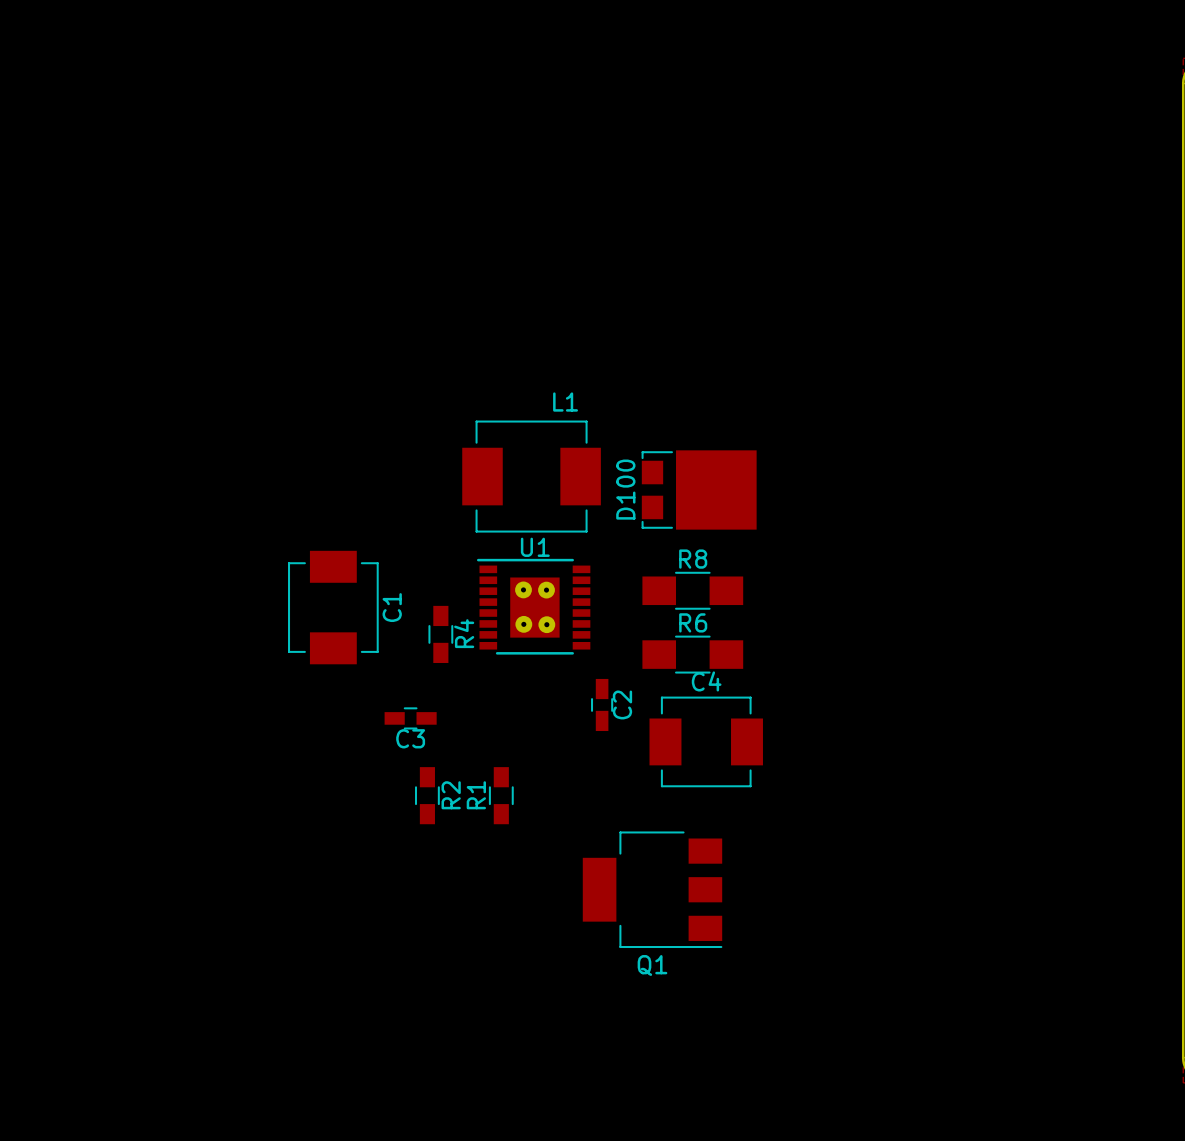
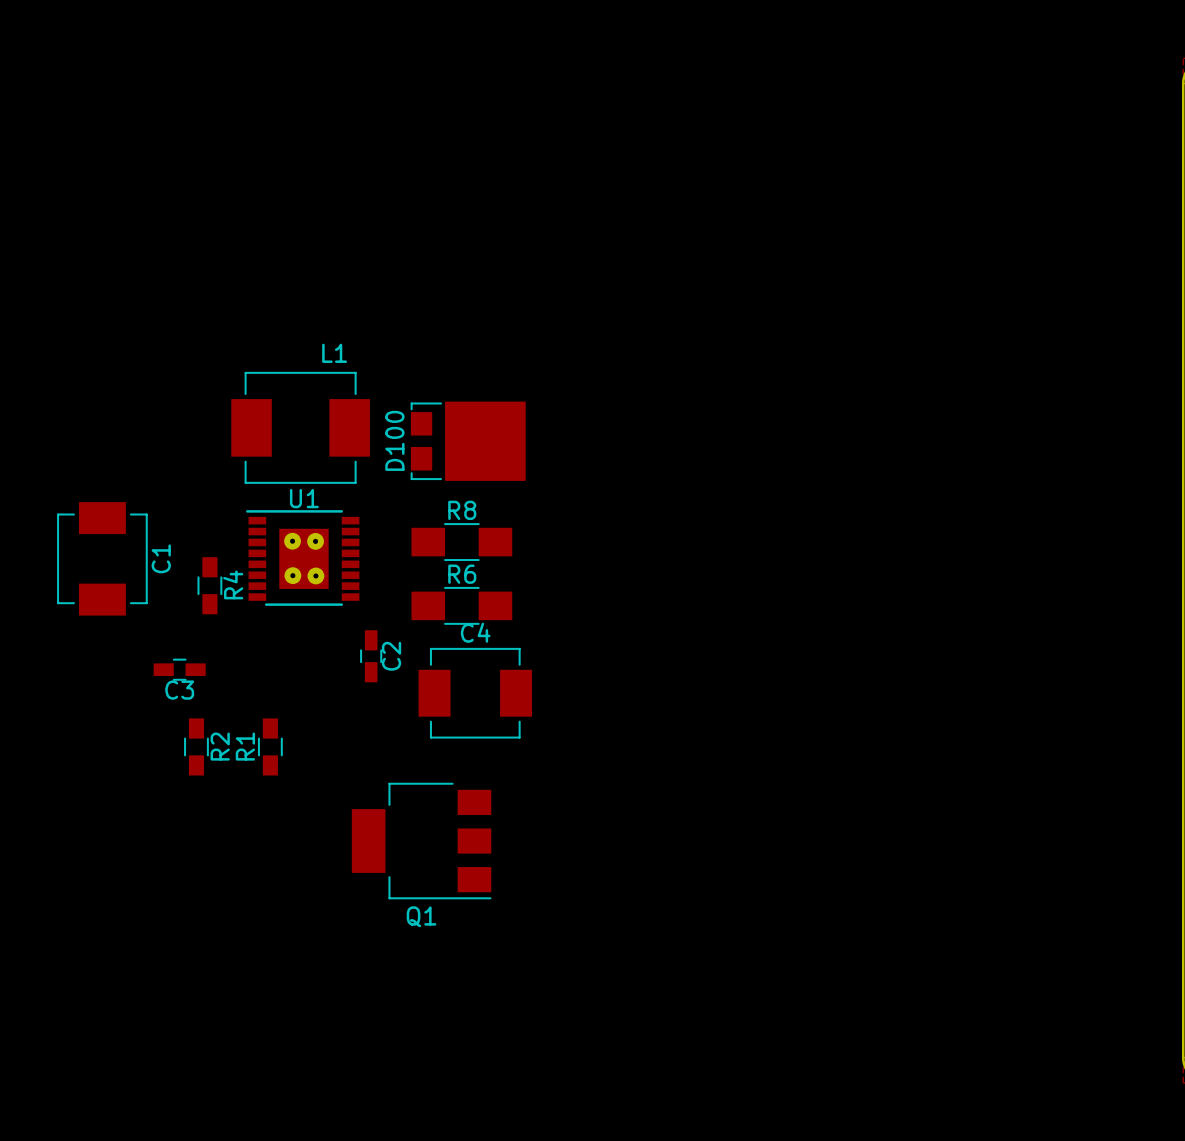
L1 position: (531, 476) -> (300, 427)
D100 position: (699, 489) -> (468, 441)
R8 position: (692, 590) -> (461, 542)
U1 position: (533, 606) -> (302, 558)
C1 position: (333, 607) -> (102, 558)
R4 position: (440, 634) -> (209, 585)
R6 position: (692, 654) -> (461, 605)
C2 position: (602, 704) -> (371, 656)
C3 position: (410, 718) -> (179, 669)
C4 position: (706, 741) -> (475, 693)
R2 position: (427, 795) -> (196, 746)
R1 position: (501, 795) -> (270, 746)
Q1 position: (652, 889) -> (421, 841)

